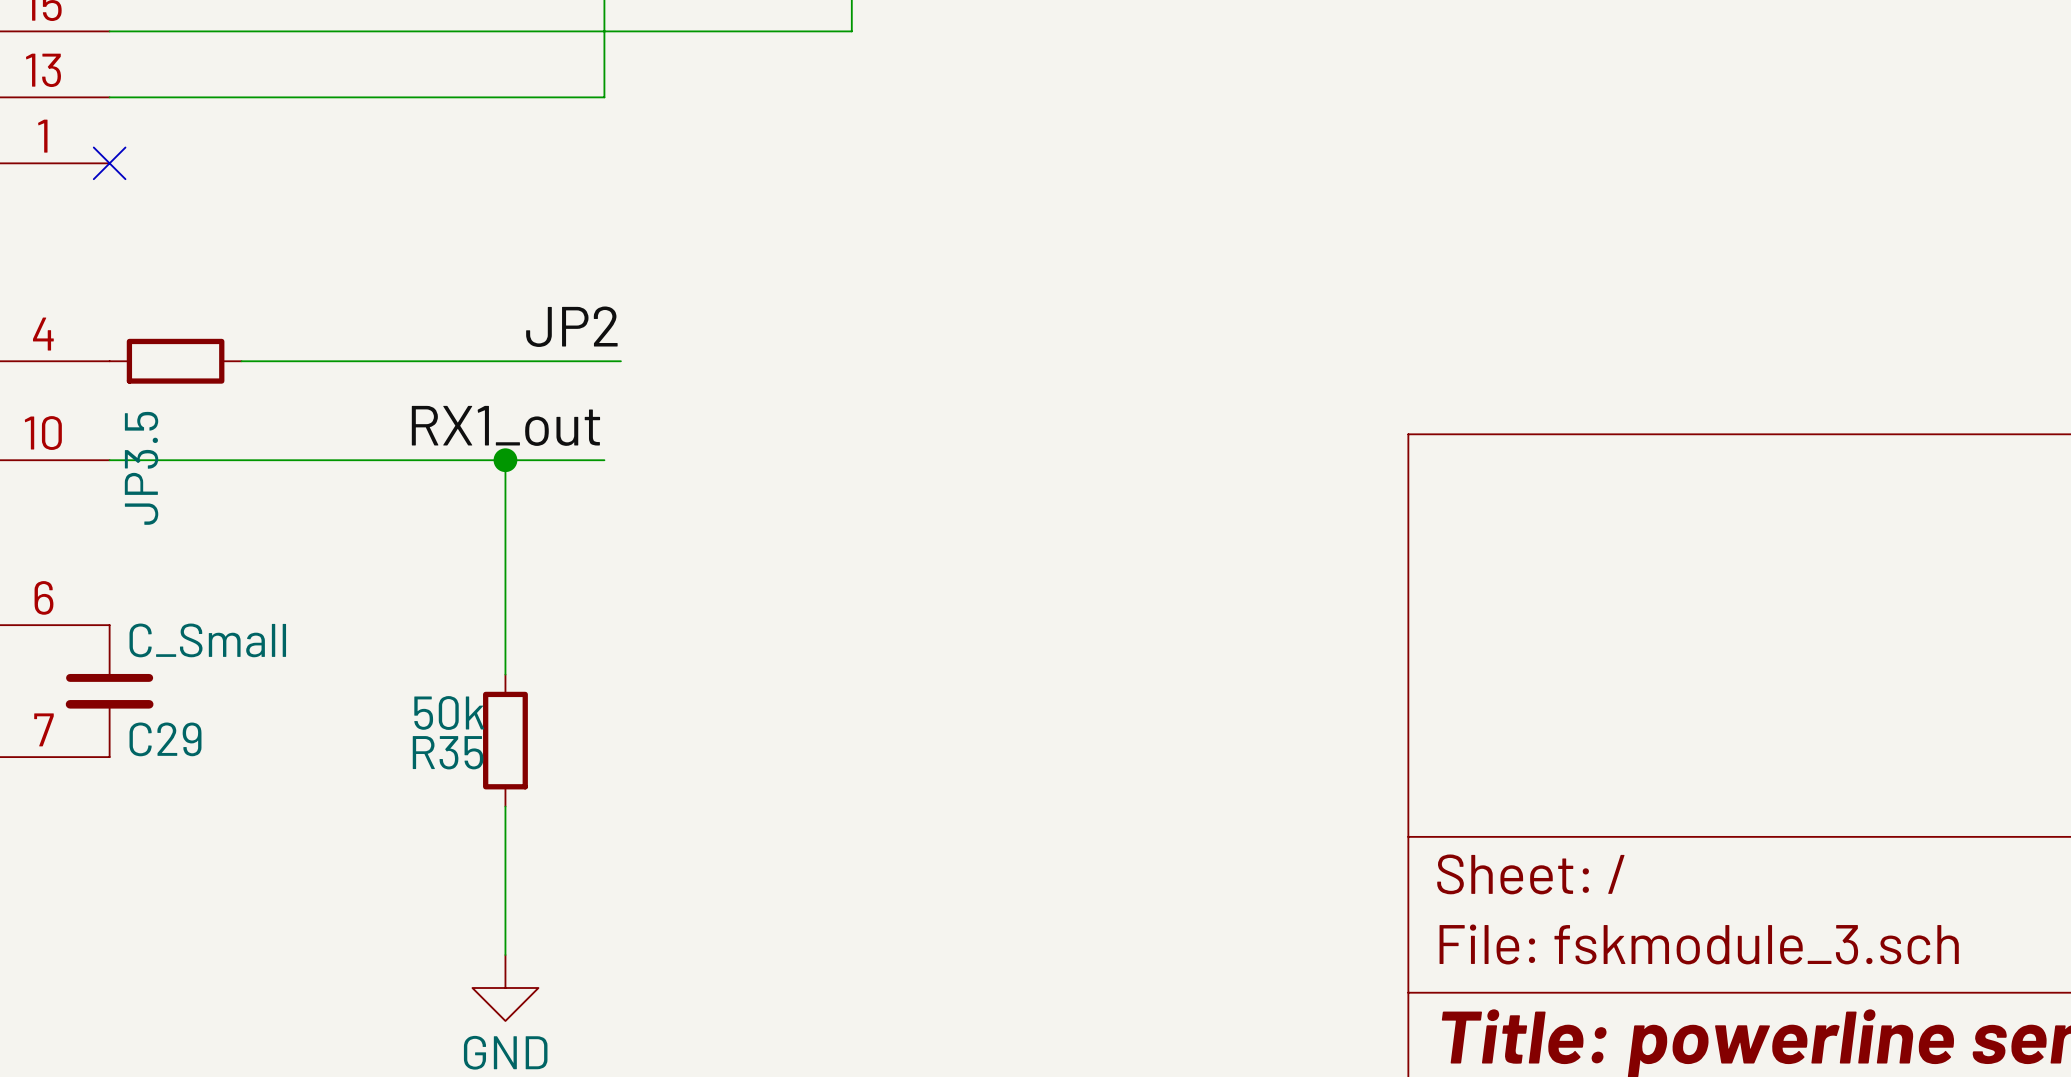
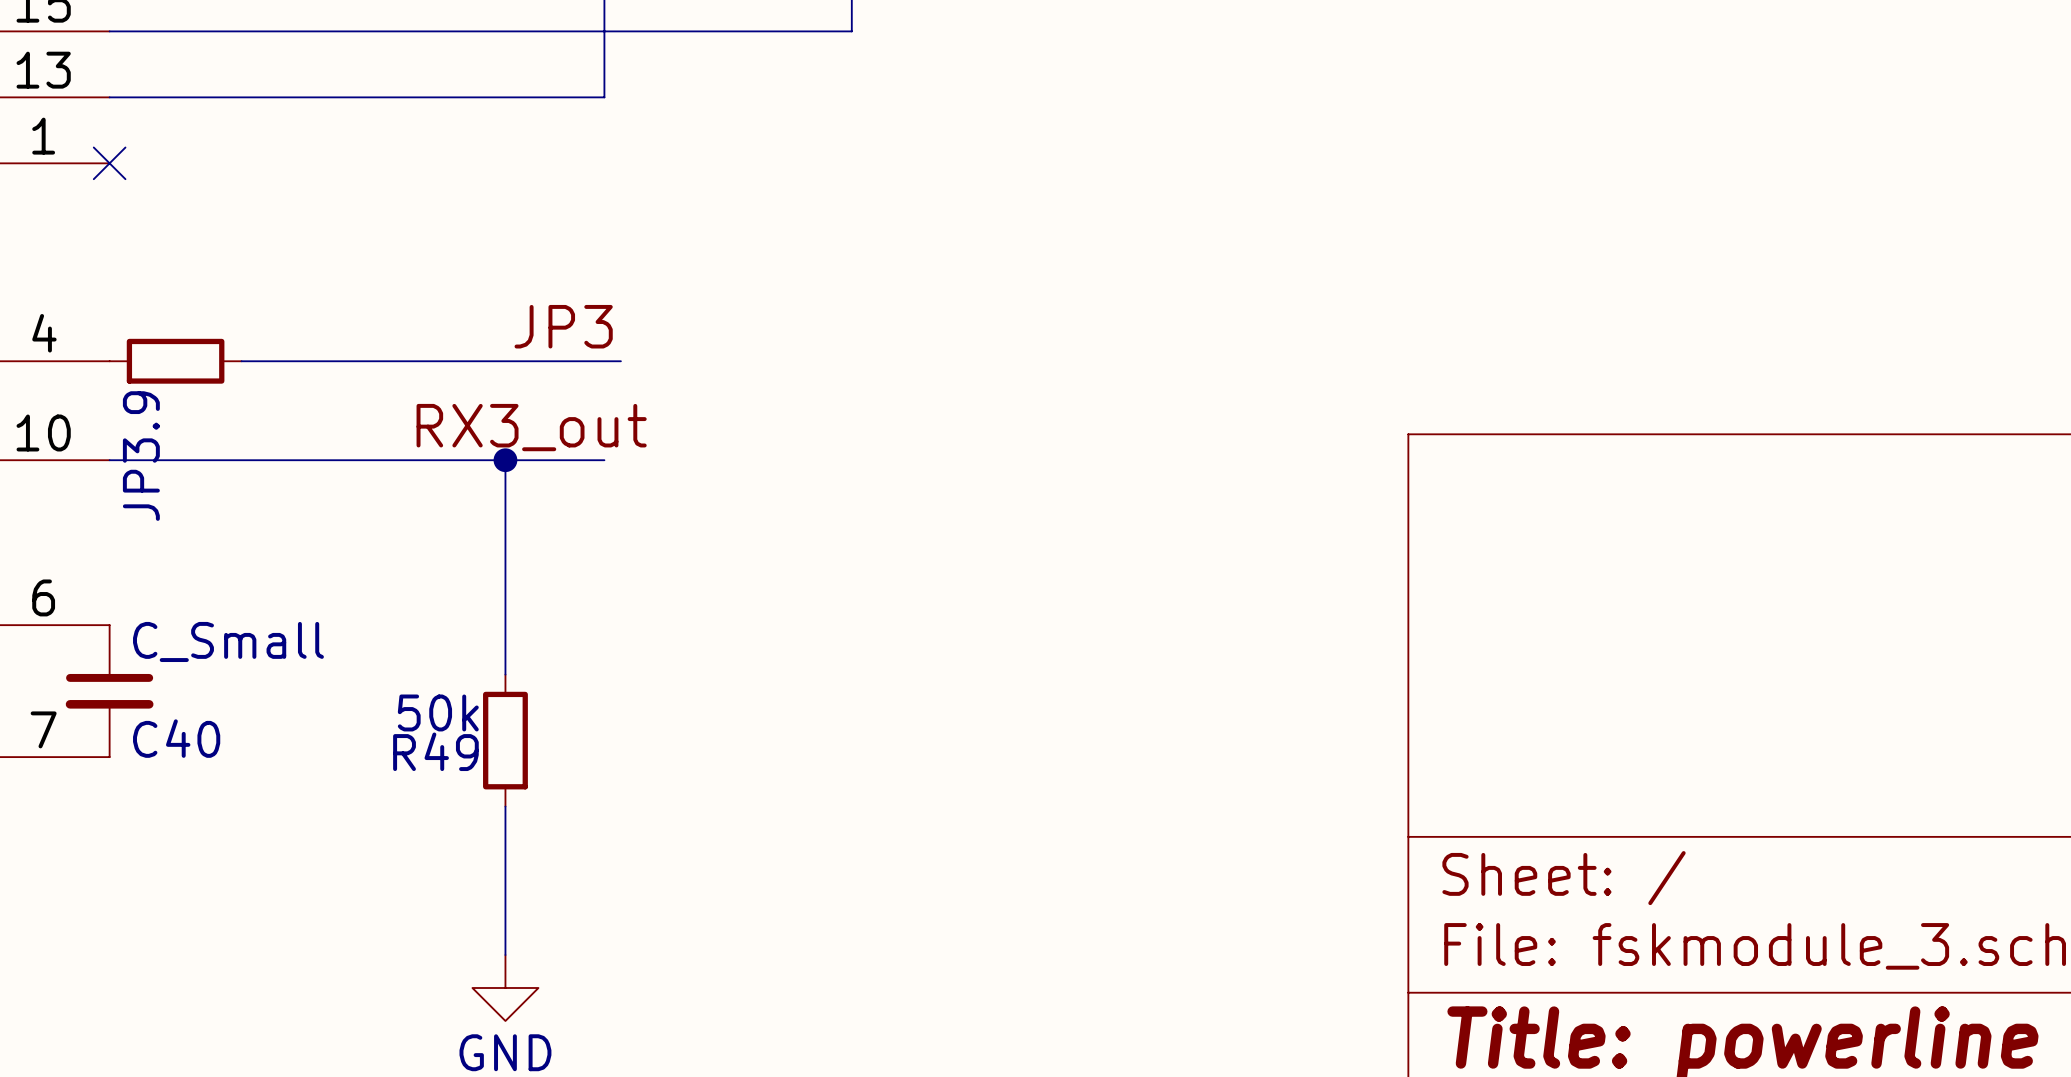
label: JP2 (571, 326) -> JP3 (563, 326)
label: RX1_out (505, 425) -> RX3_out (531, 427)
JP3.5 name: JP3.5 (141, 468) -> JP3.9 (141, 456)
C29 name: C29 (165, 739) -> C40 (176, 738)
R35 name: R35 (448, 752) -> R49 (435, 751)

